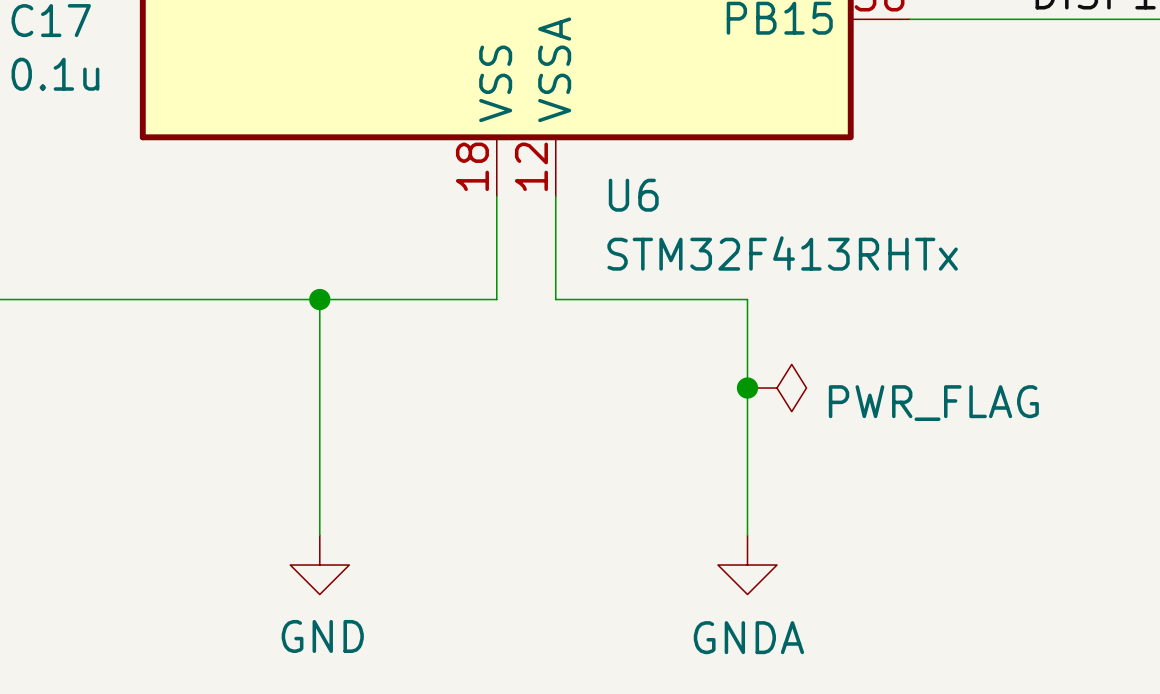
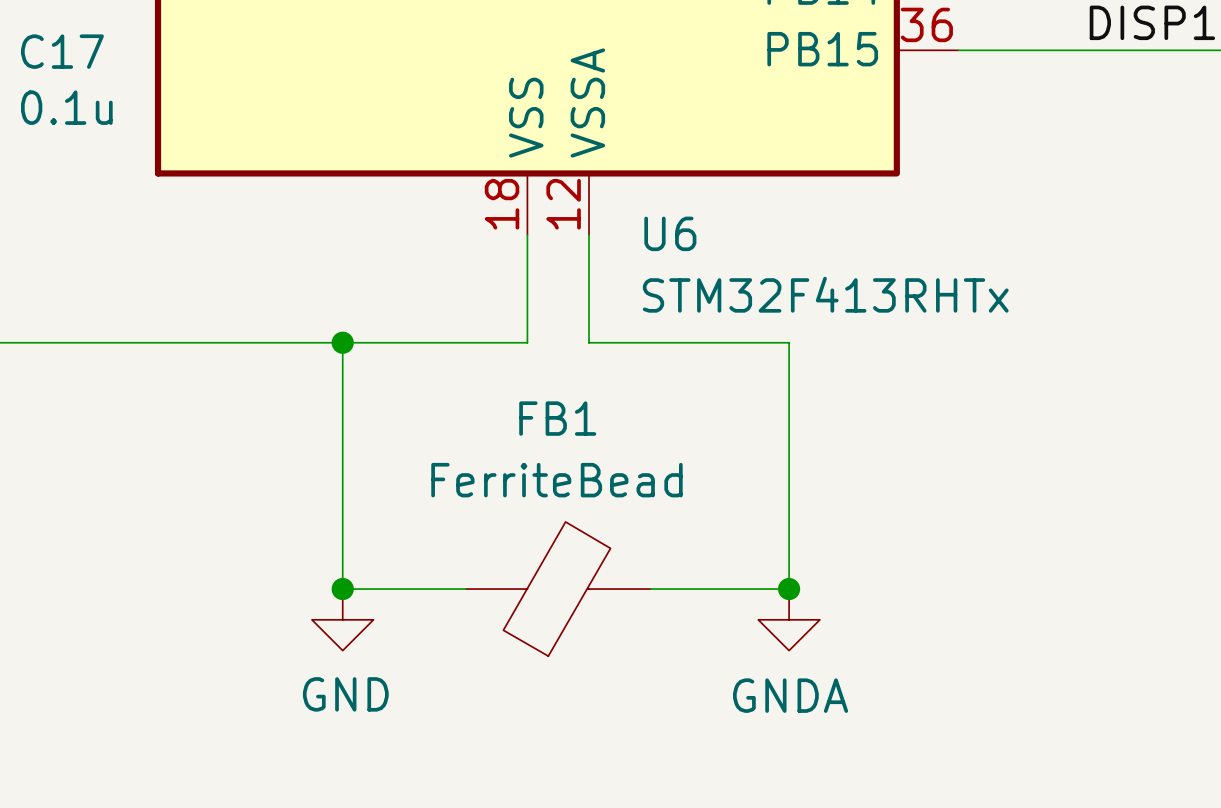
junction: (747, 388) -> none
power symbol: PWR_FLAG (777, 388) -> none
wire: none -> (342, 589) (465, 589)
junction: none -> (342, 589)
FB1: none -> FerriteBead (558, 589)
wire: none -> (650, 589) (789, 589)
junction: none -> (789, 589)

